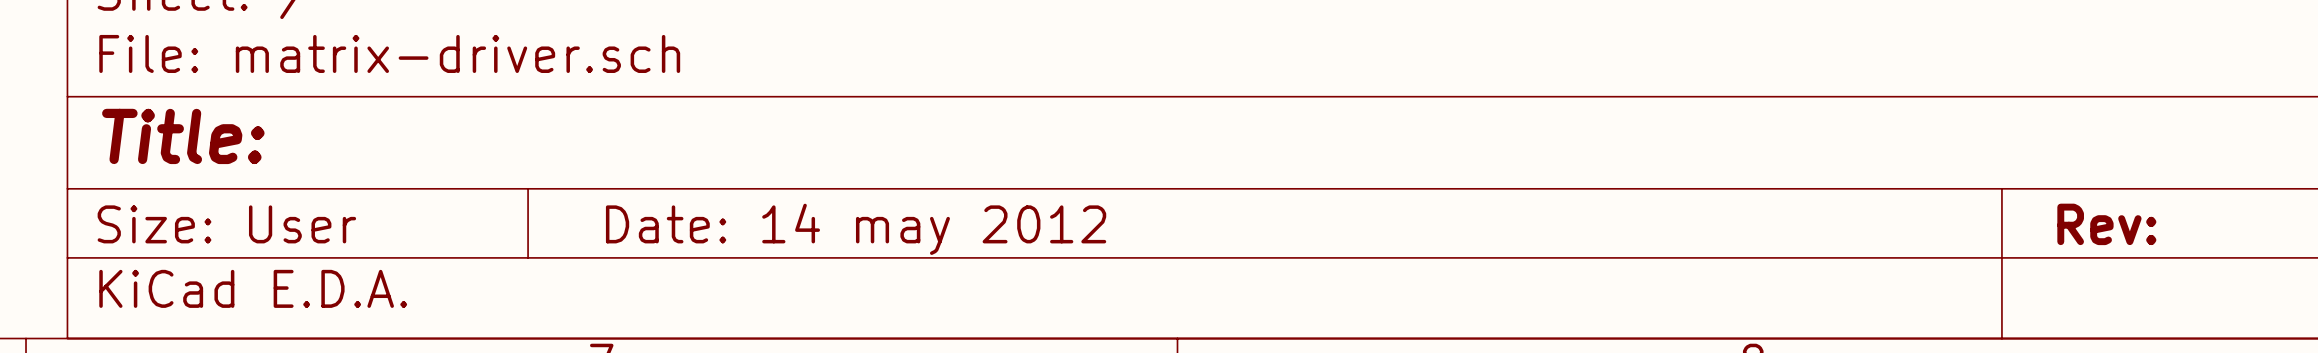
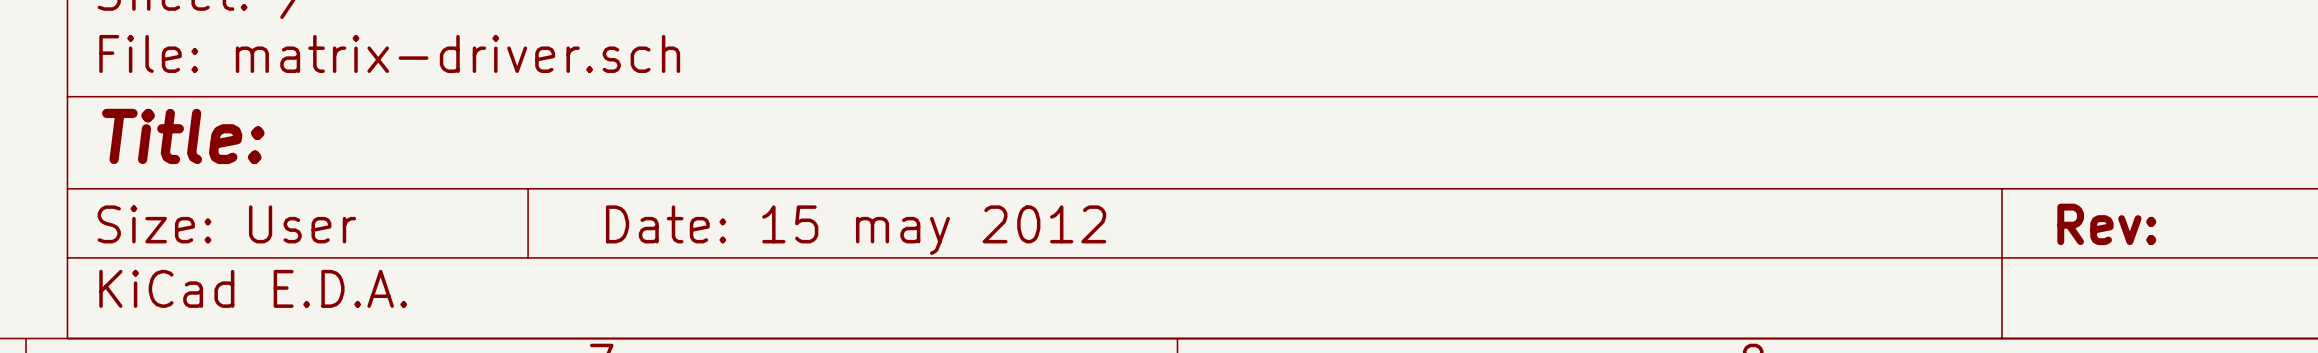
title block: Date: 14 may 2012 (856, 229) -> Date: 15 may 2012 (856, 230)

